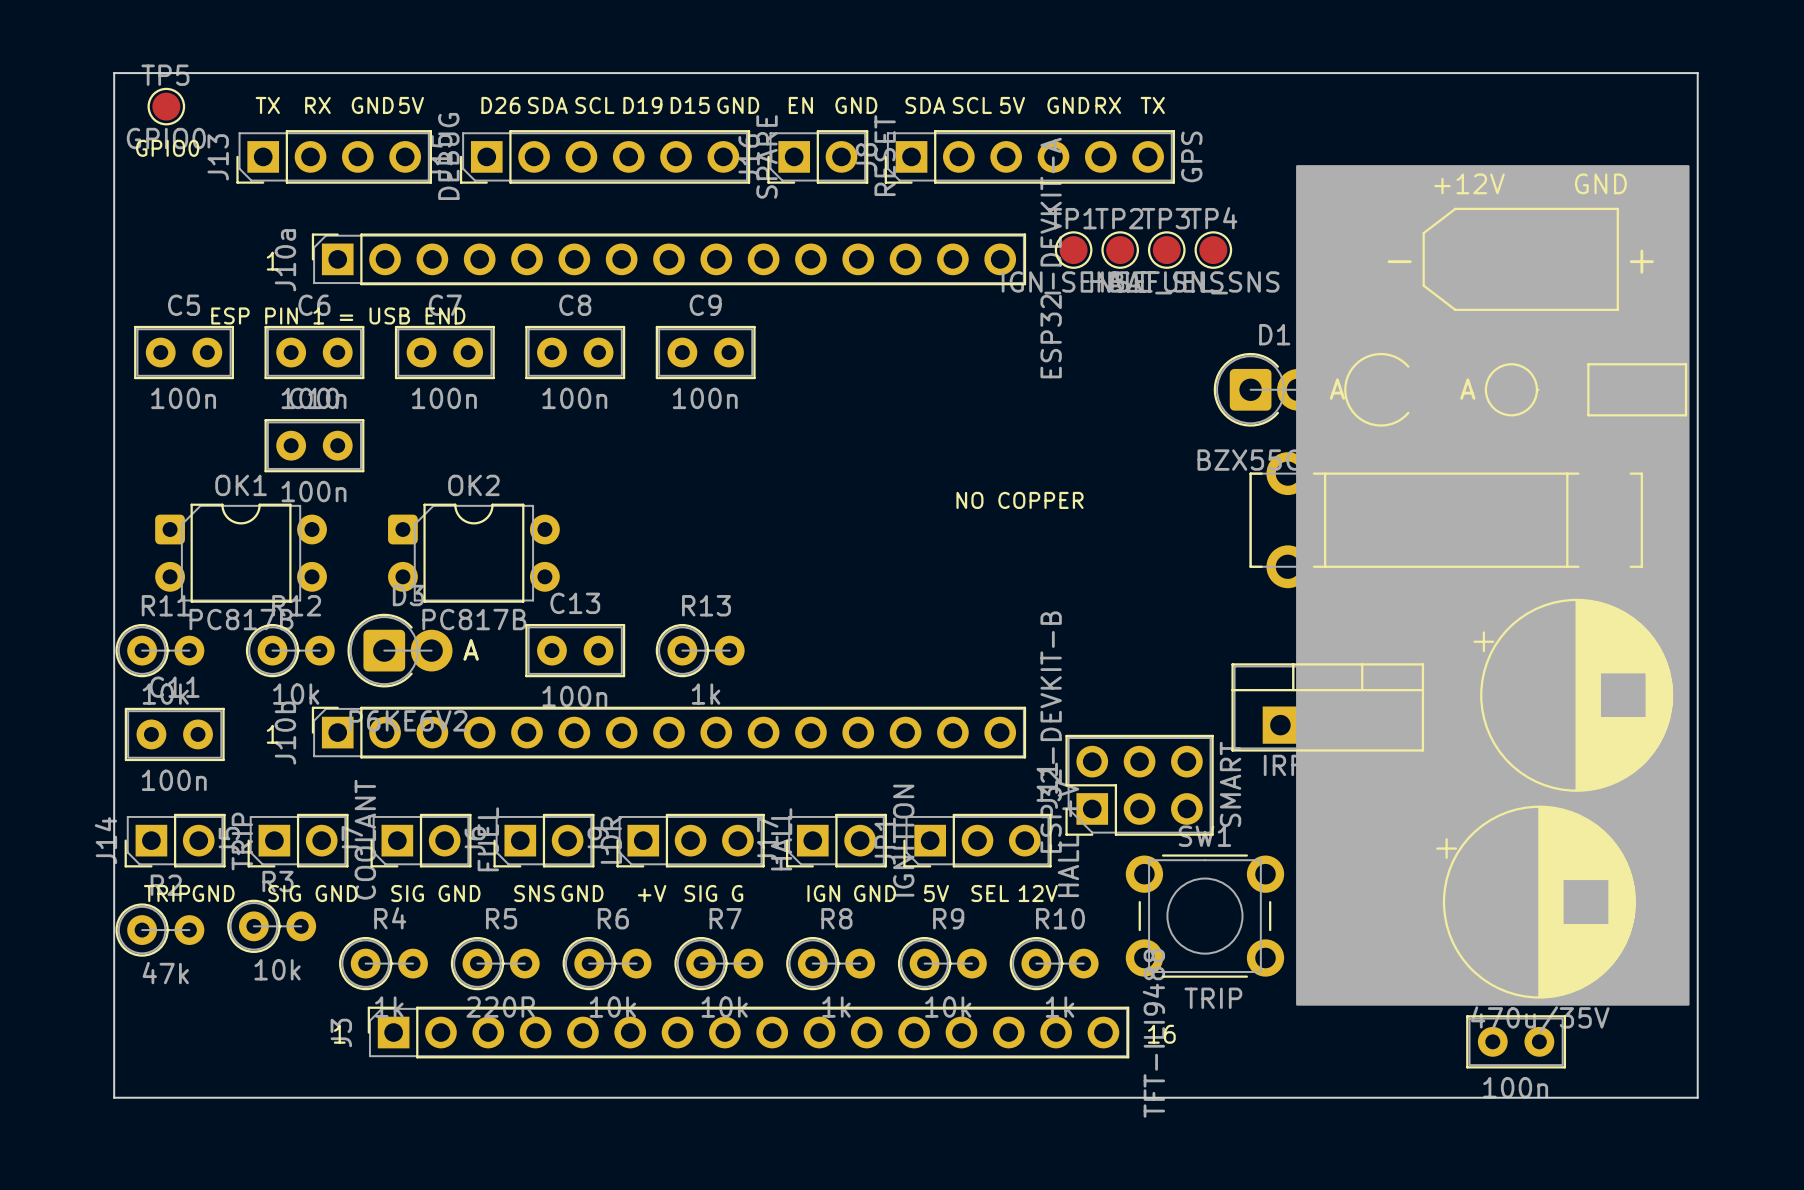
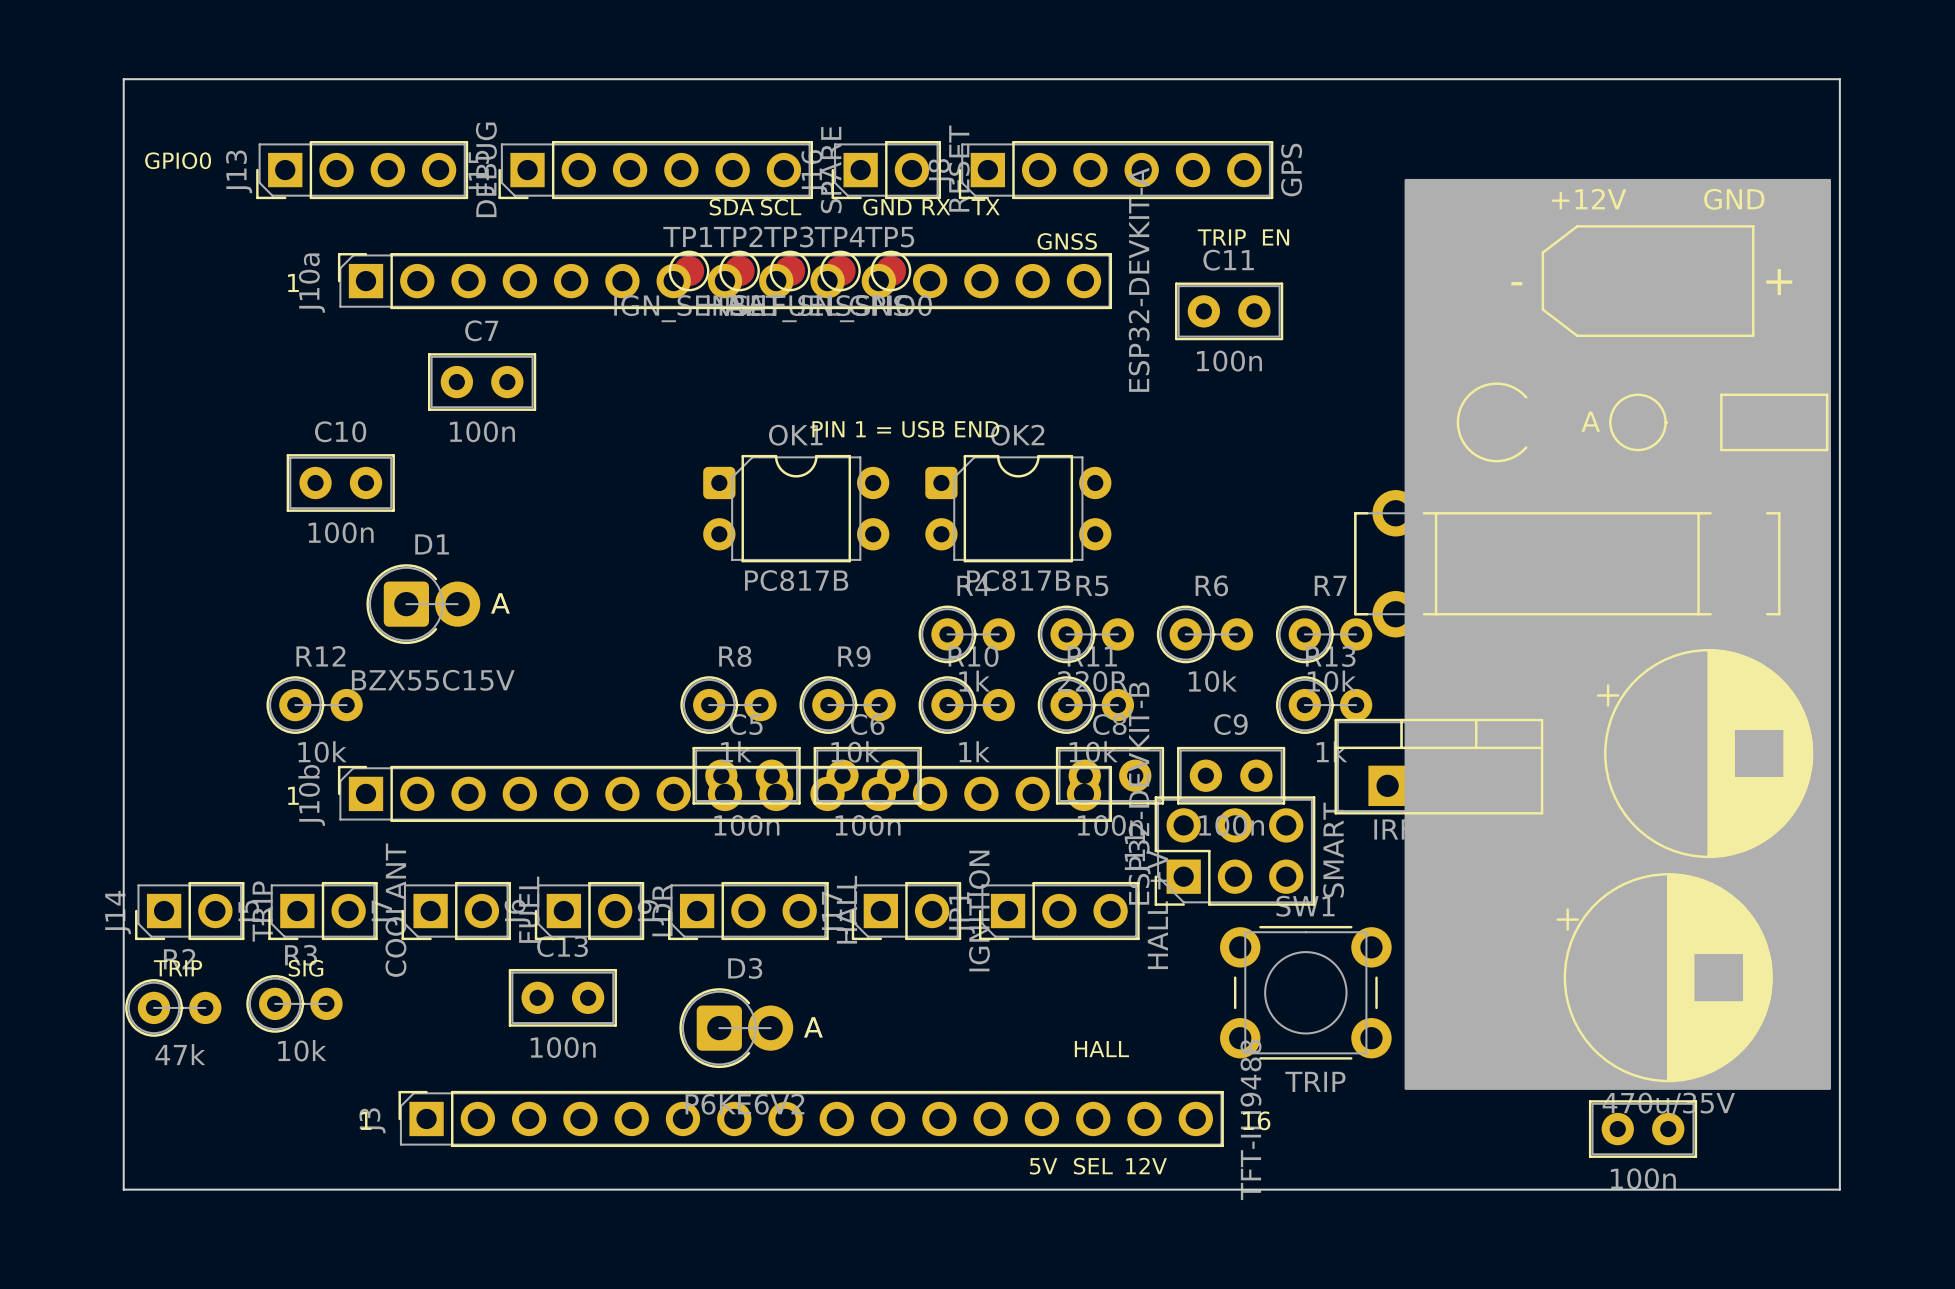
text: TX (267, 105) -> none
text: RX (317, 105) -> none
text: GND (372, 105) -> none
text: 5V (411, 105) -> none
text: D26 (500, 105) -> none
text: SDA (547, 105) -> none
text: SCL (594, 105) -> none
text: D19 (642, 105) -> none
text: D15 (690, 105) -> none
text: GND (738, 105) -> none
text: EN (800, 105) -> none
text: GND (856, 105) -> none
text: SDA (925, 105) -> none
text: SCL (972, 105) -> none
text: 5V (1012, 105) -> none
text: GND (1068, 105) -> none
text position: RX (1108, 105) -> RX (936, 207)
text position: TX (1152, 105) -> TX (985, 207)
TP5 position: (166, 106) -> (890, 270)
text: none -> SDA (732, 207)
text: none -> SCL (781, 207)
text: none -> GND (887, 207)
text: none -> TRIP EN (1243, 237)
text: none -> GNSS (1067, 241)
TP1 position: (1073, 250) -> (689, 270)
TP2 position: (1120, 250) -> (739, 270)
TP3 position: (1166, 250) -> (789, 270)
TP4 position: (1213, 250) -> (840, 270)
text: ESP PIN 1 = USB END (338, 315) -> none
C5 position: (184, 352) -> (746, 775)
C6 position: (314, 352) -> (867, 775)
C8 position: (575, 352) -> (1110, 775)
C9 position: (705, 352) -> (1231, 775)
D1 position: (1266, 389) -> (423, 604)
text: none -> PIN 1 = USB END (905, 429)
text: NO COPPER (1020, 500) -> none
OK1 position: (241, 553) -> (796, 508)
OK2 position: (473, 553) -> (1018, 508)
R11 position: (159, 650) -> (1085, 705)
D3 position: (399, 650) -> (736, 1028)
C13 position: (575, 650) -> (562, 997)
R13 position: (700, 650) -> (1324, 705)
C11 position: (174, 734) -> (1229, 311)
text: GND (213, 893) -> none
text: GND (336, 893) -> none
text: SIG (407, 893) -> none
text: GND (459, 893) -> none
text: SNS (534, 893) -> none
text: GND (582, 893) -> none
text: +V (652, 893) -> none
text: SIG (700, 893) -> none
text: G (737, 893) -> none
text: IGN (823, 893) -> none
text: GND (874, 893) -> none
text position: 5V (936, 893) -> 5V (1043, 1166)
text position: SEL (990, 893) -> SEL (1093, 1166)
text position: 12V (1038, 893) -> 12V (1146, 1166)
R4 position: (383, 963) -> (966, 634)
R5 position: (495, 963) -> (1085, 634)
R6 position: (607, 963) -> (1204, 634)
R7 position: (718, 963) -> (1324, 634)
R8 position: (830, 963) -> (728, 705)
R9 position: (942, 963) -> (847, 705)
R10 position: (1054, 963) -> (966, 705)
text: none -> HALL (1101, 1049)

